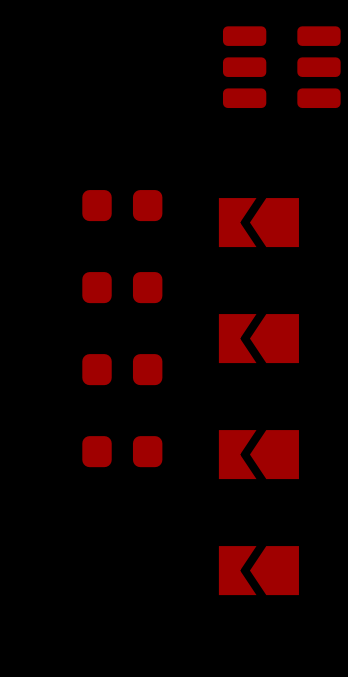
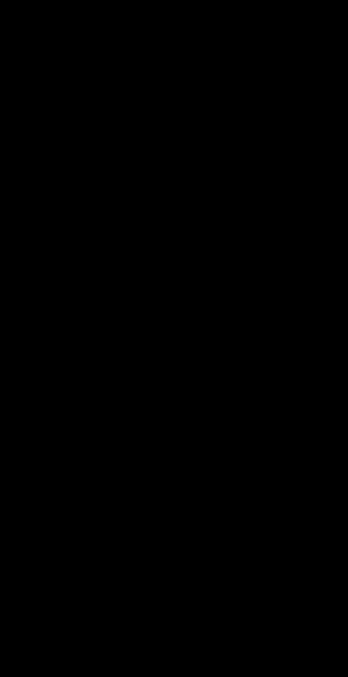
part: (281, 67) -> none
part: (122, 205) -> none
part: (258, 222) -> none
part: (122, 287) -> none
part: (258, 338) -> none
part: (122, 369) -> none
part: (122, 451) -> none
part: (258, 454) -> none
part: (258, 570) -> none

